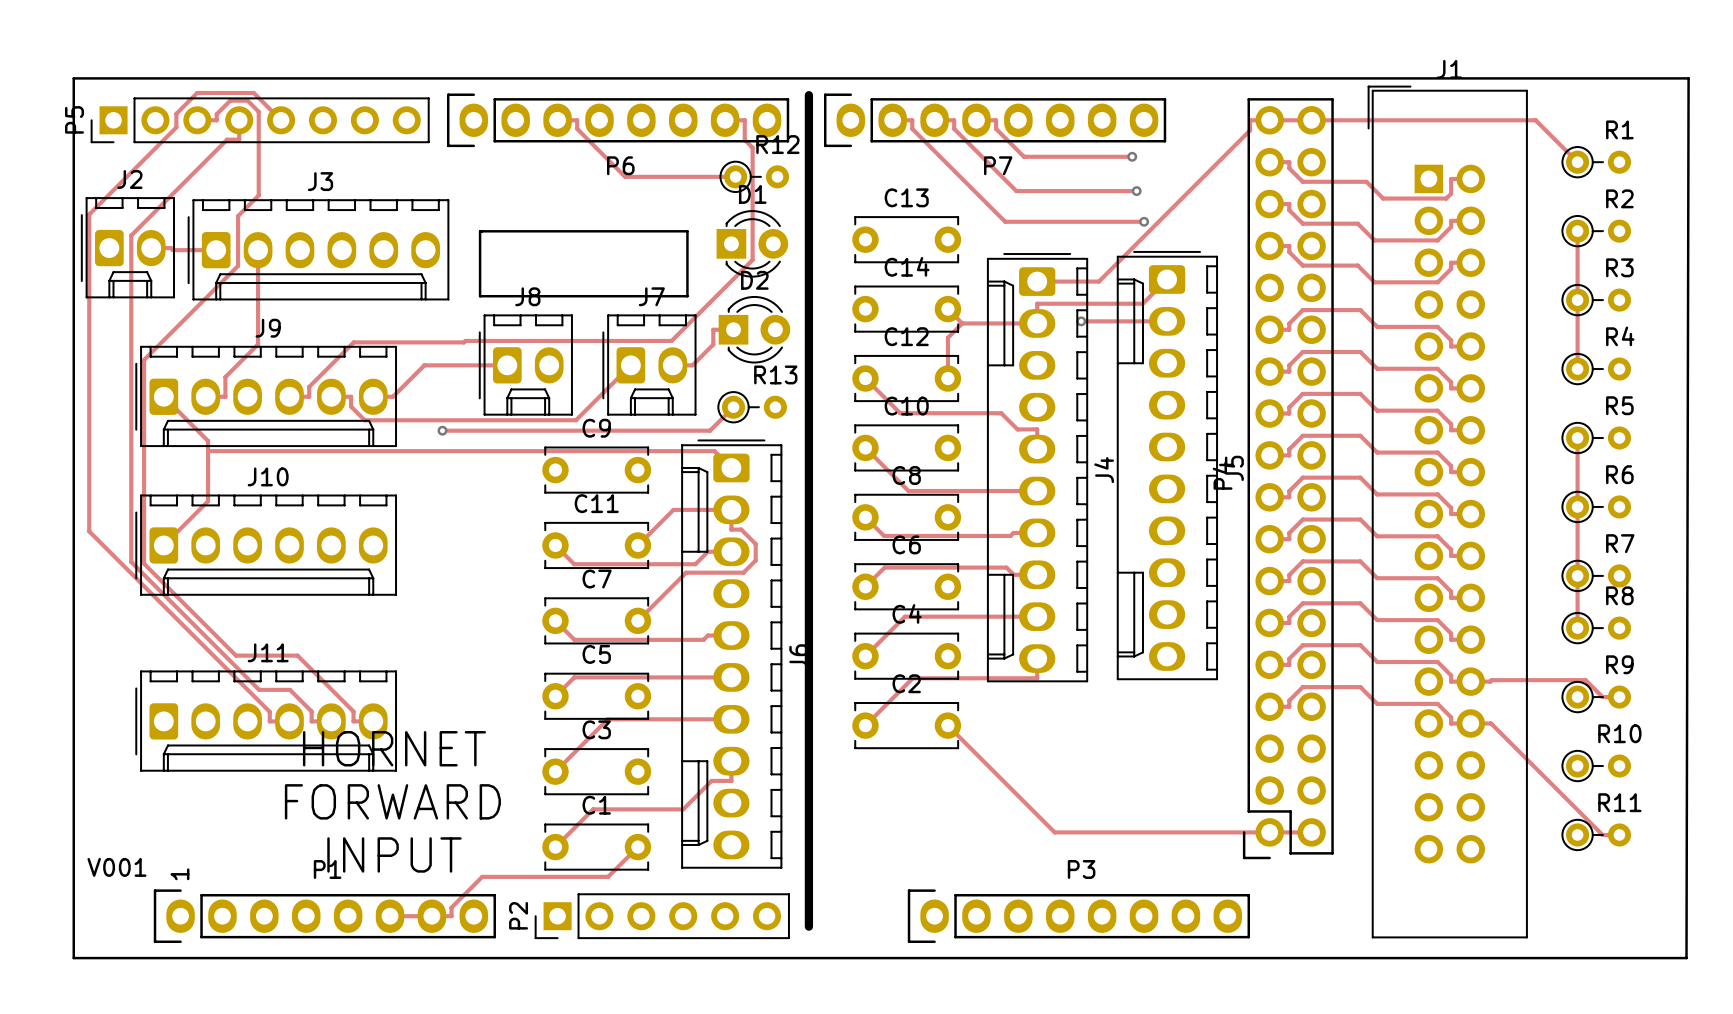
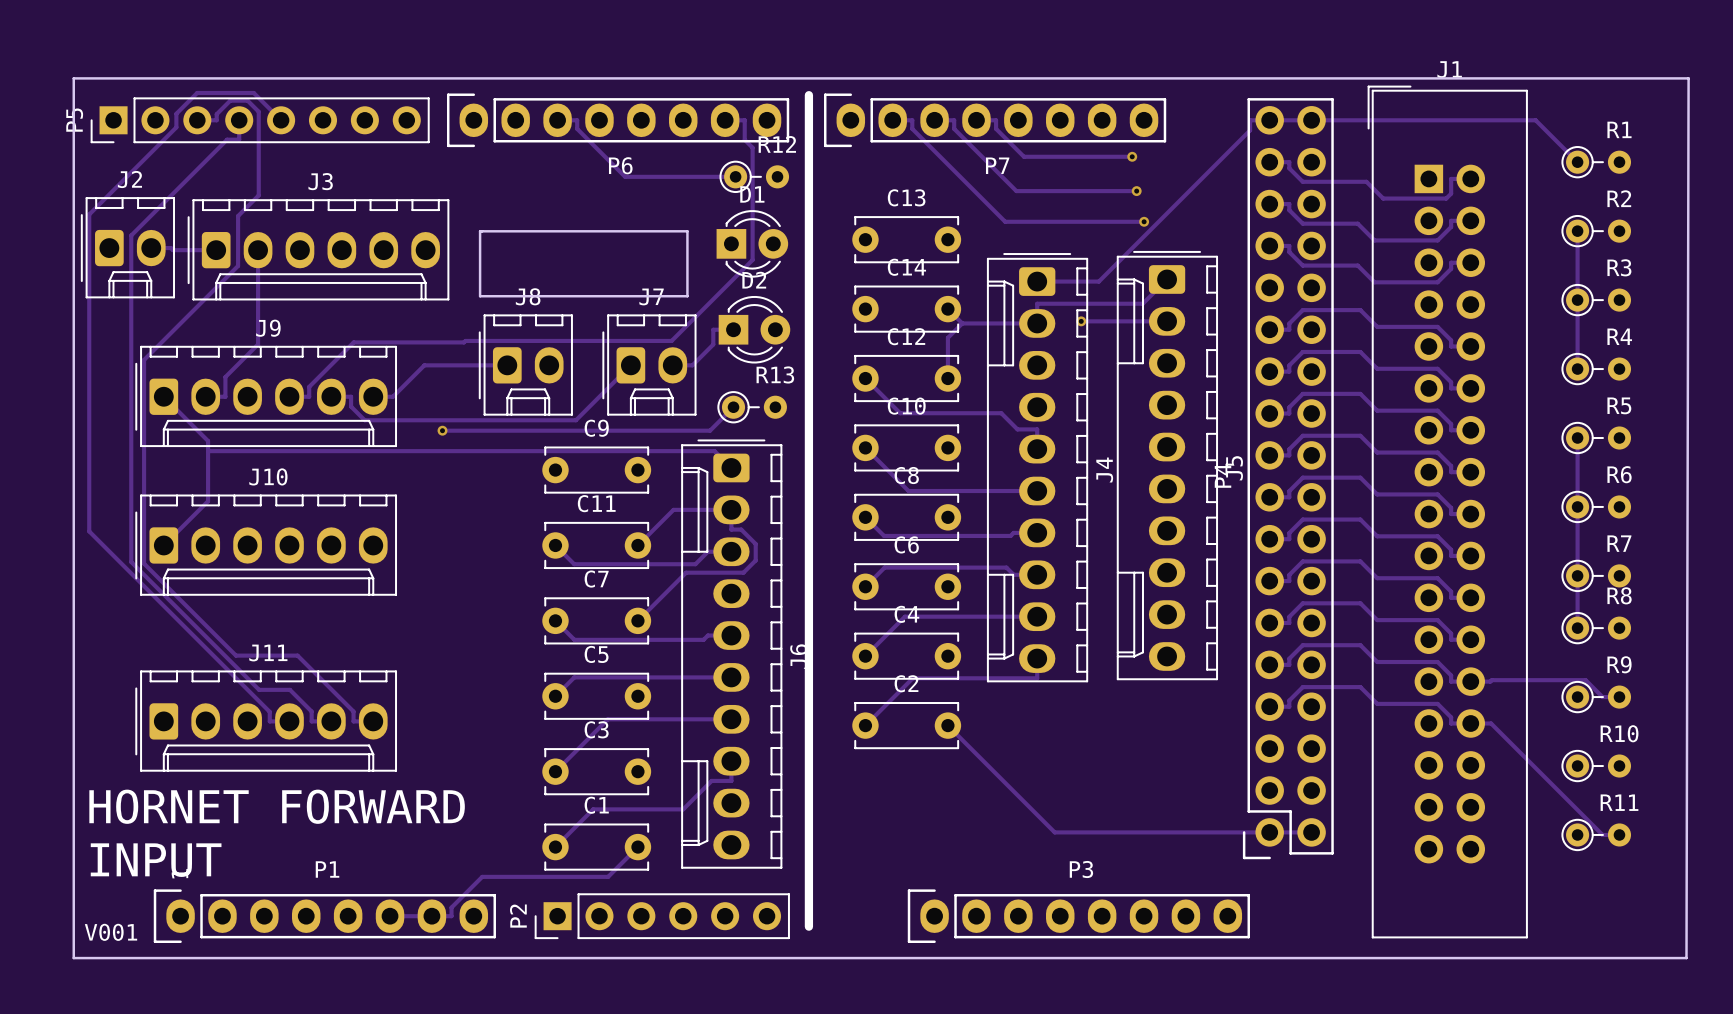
text: HORNET (394, 748) -> none
text: FORWARD (392, 801) -> HORNET FORWARD (277, 806)
text position: INPUT (394, 854) -> INPUT (156, 860)
text position: V001 (116, 867) -> V001 (111, 932)

